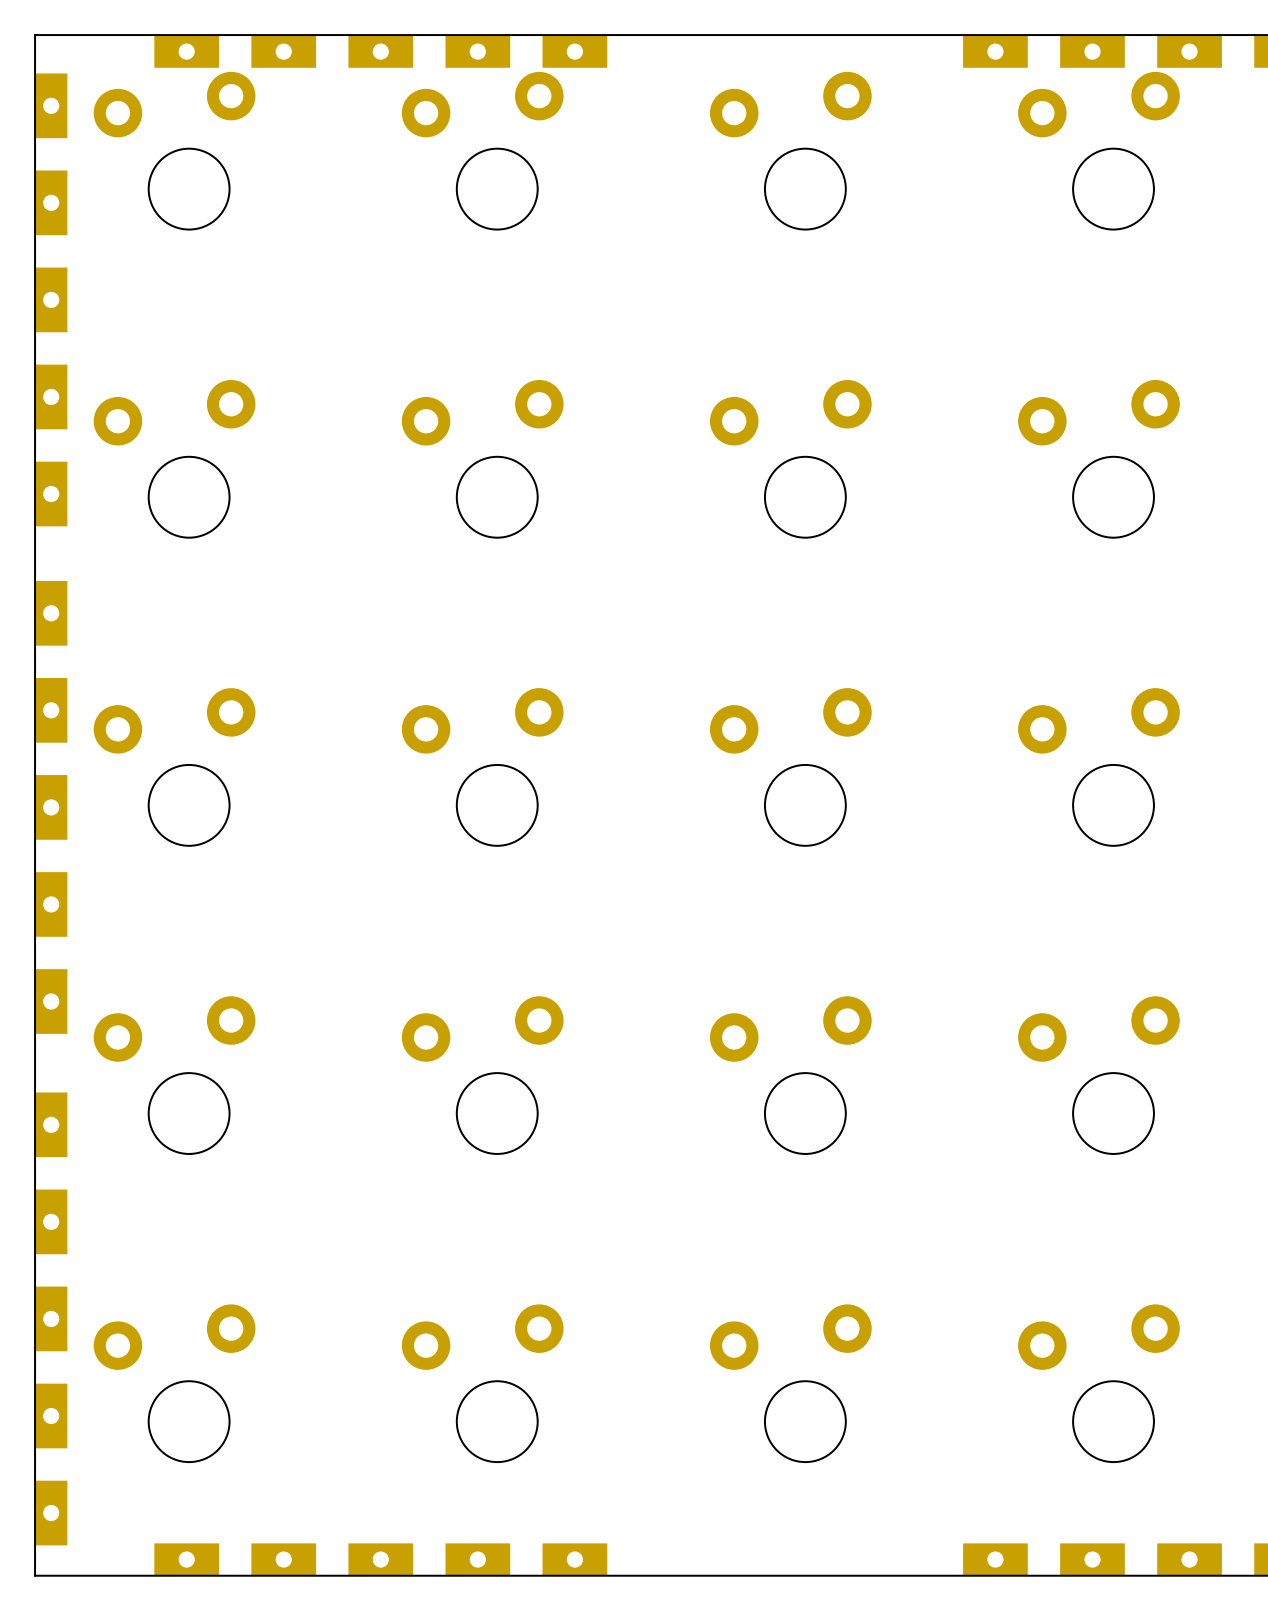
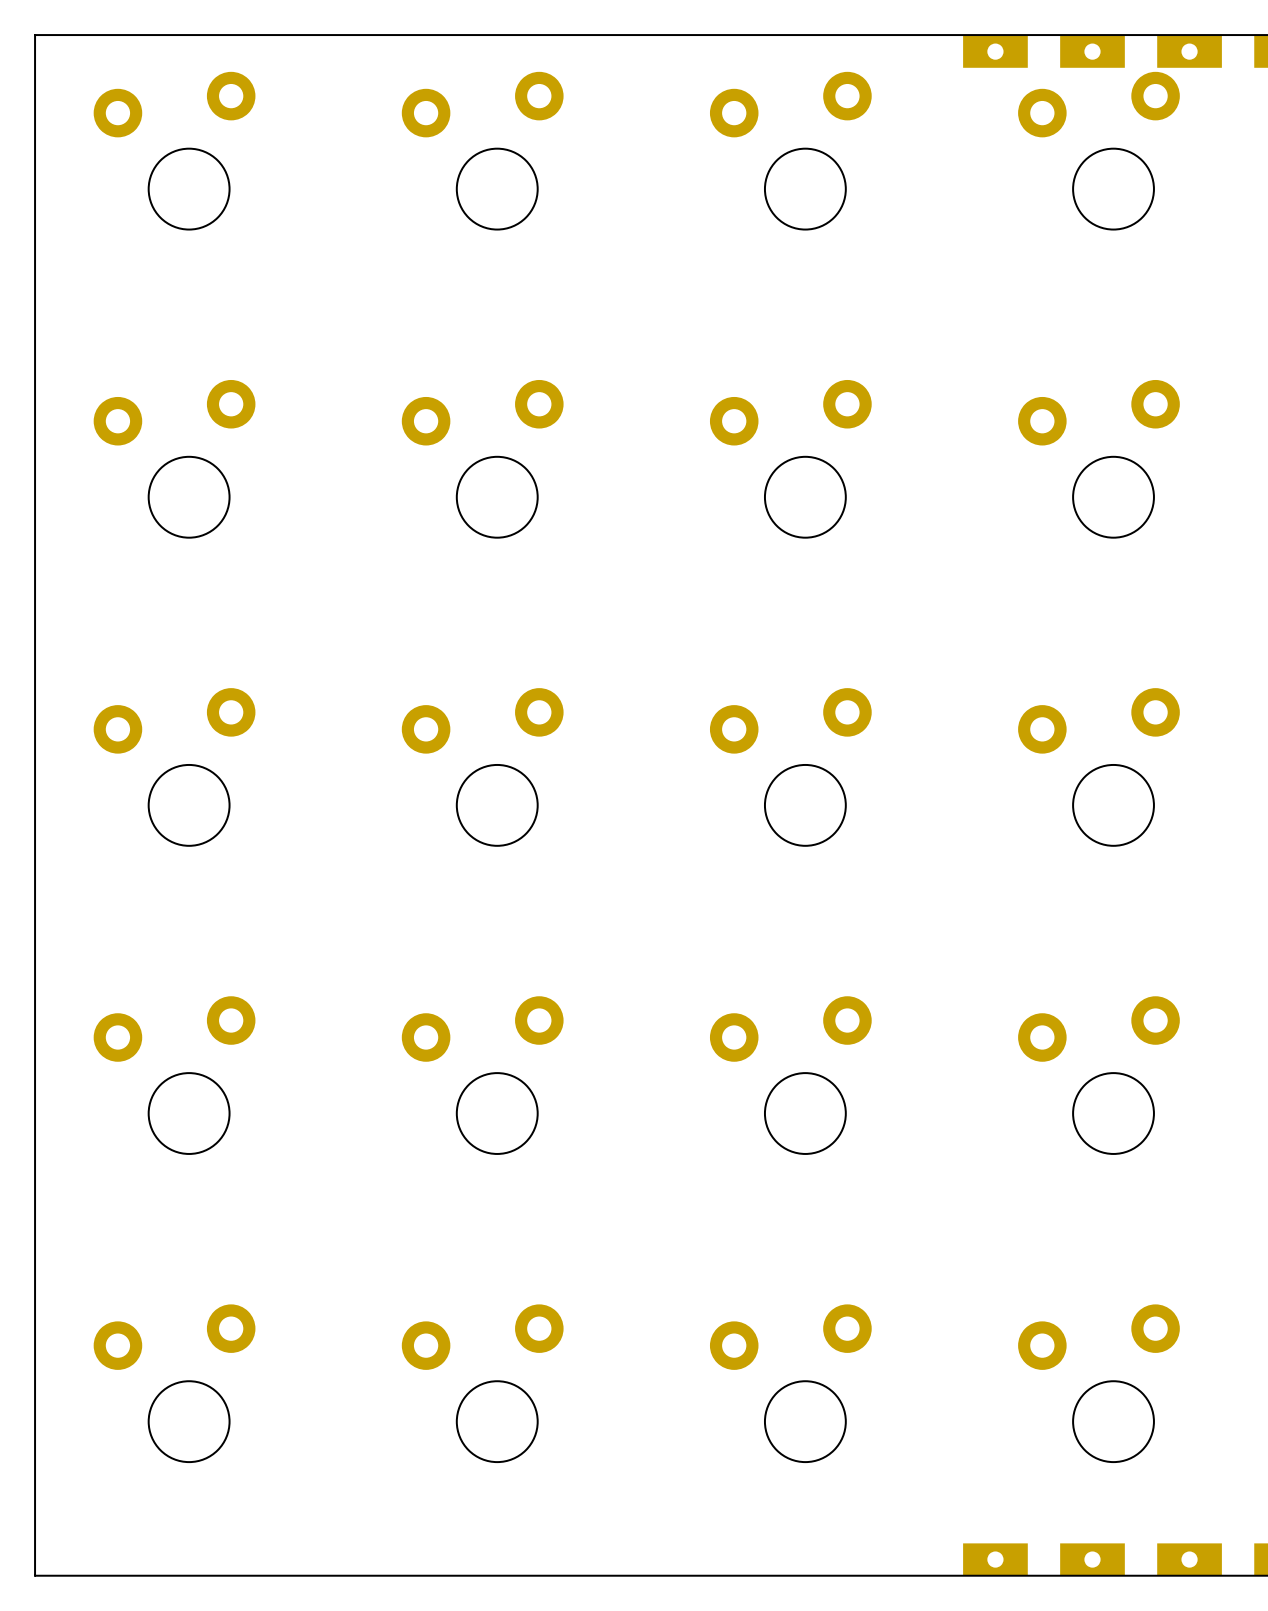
part: (380, 51) -> none
part: (51, 299) -> none
part: (51, 807) -> none
part: (51, 1318) -> none
part: (380, 1559) -> none

